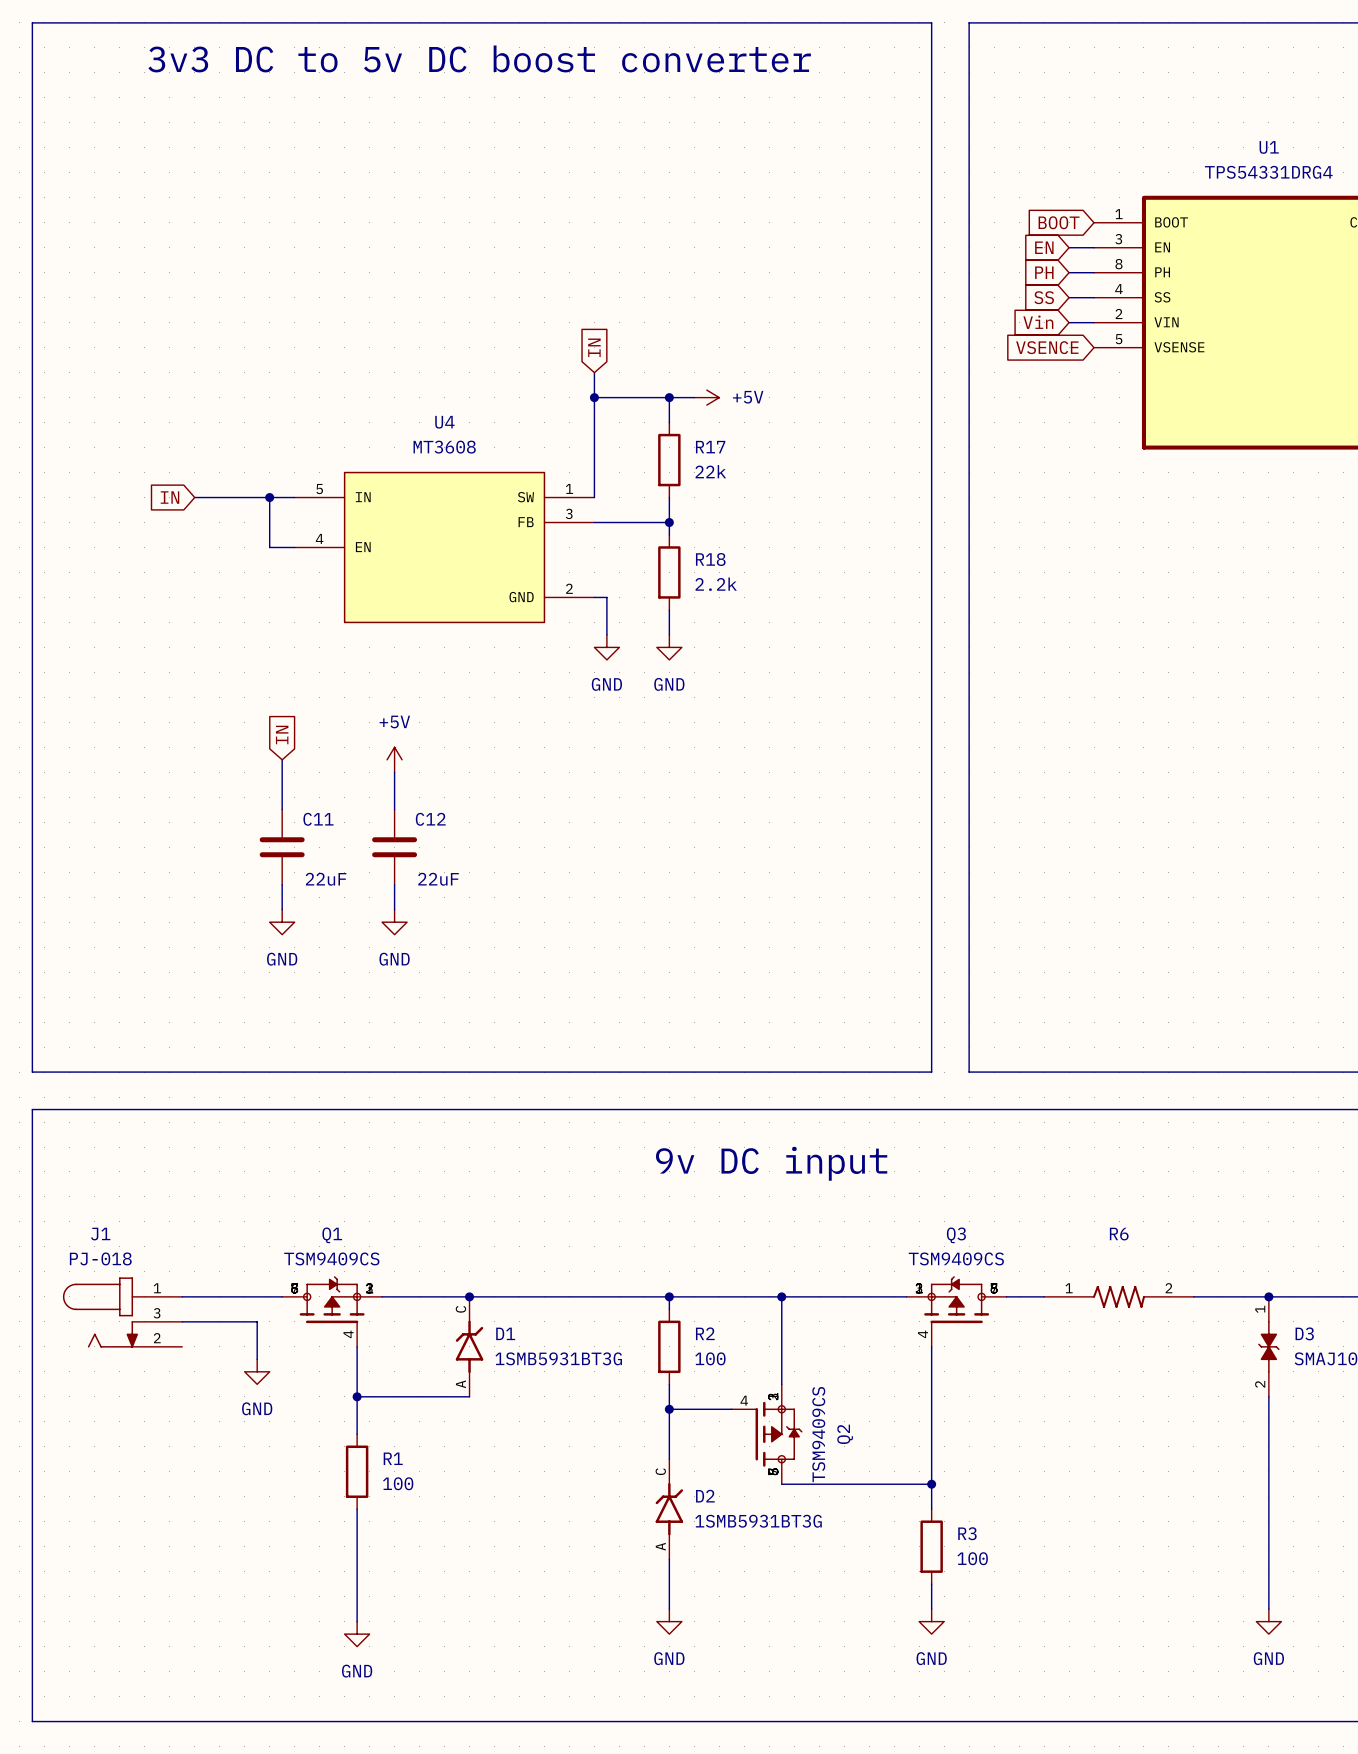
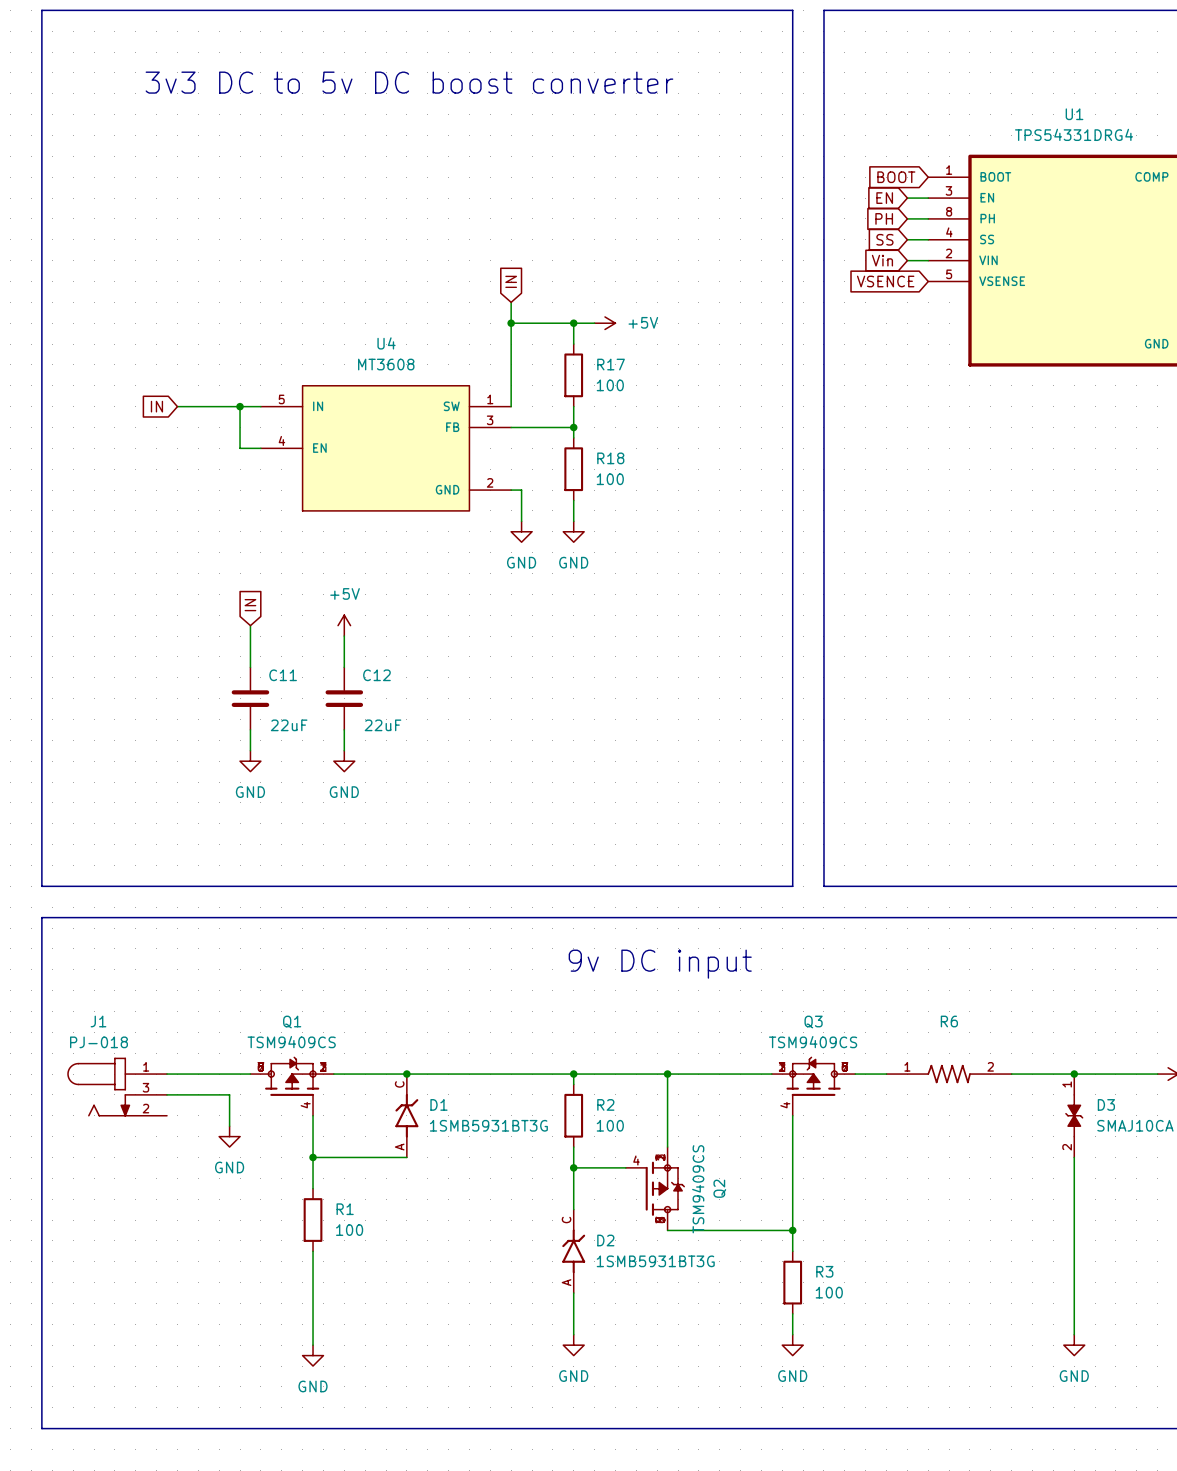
text position: 3v3 DC to 5v DC boost converter (479, 58) -> 3v3 DC to 5v DC boost converter (409, 82)
R17 value: 22k (710, 471) -> 100 (610, 385)
R18 value: 2.2k (716, 584) -> 100 (610, 479)

